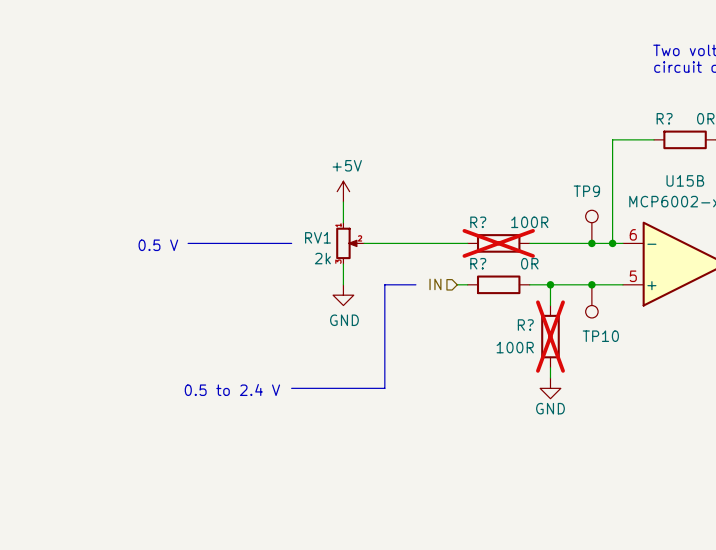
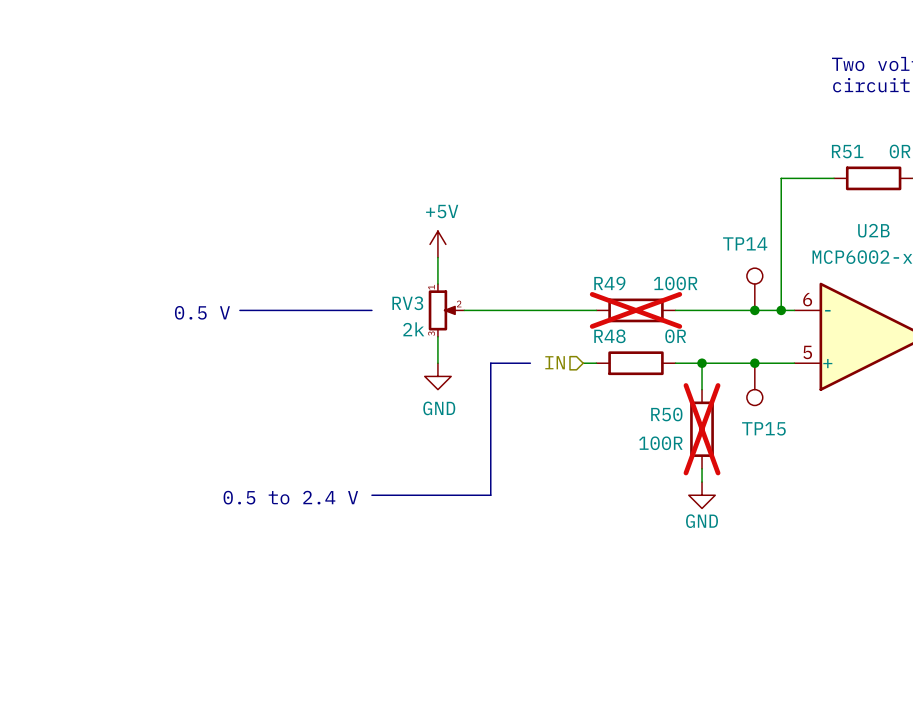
R? name: R? (664, 118) -> R51 (847, 151)
U15B name: U15B (685, 180) -> U2B (873, 230)
TP9 name: TP9 (586, 191) -> TP14 (745, 243)
R? name: R? (478, 222) -> R49 (609, 283)
RV1 name: RV1 (317, 237) -> RV3 (407, 303)
R? name: R? (478, 263) -> R48 (609, 336)
R? name: R? (525, 325) -> R50 (666, 414)
TP10 name: TP10 (600, 336) -> TP15 (763, 428)

